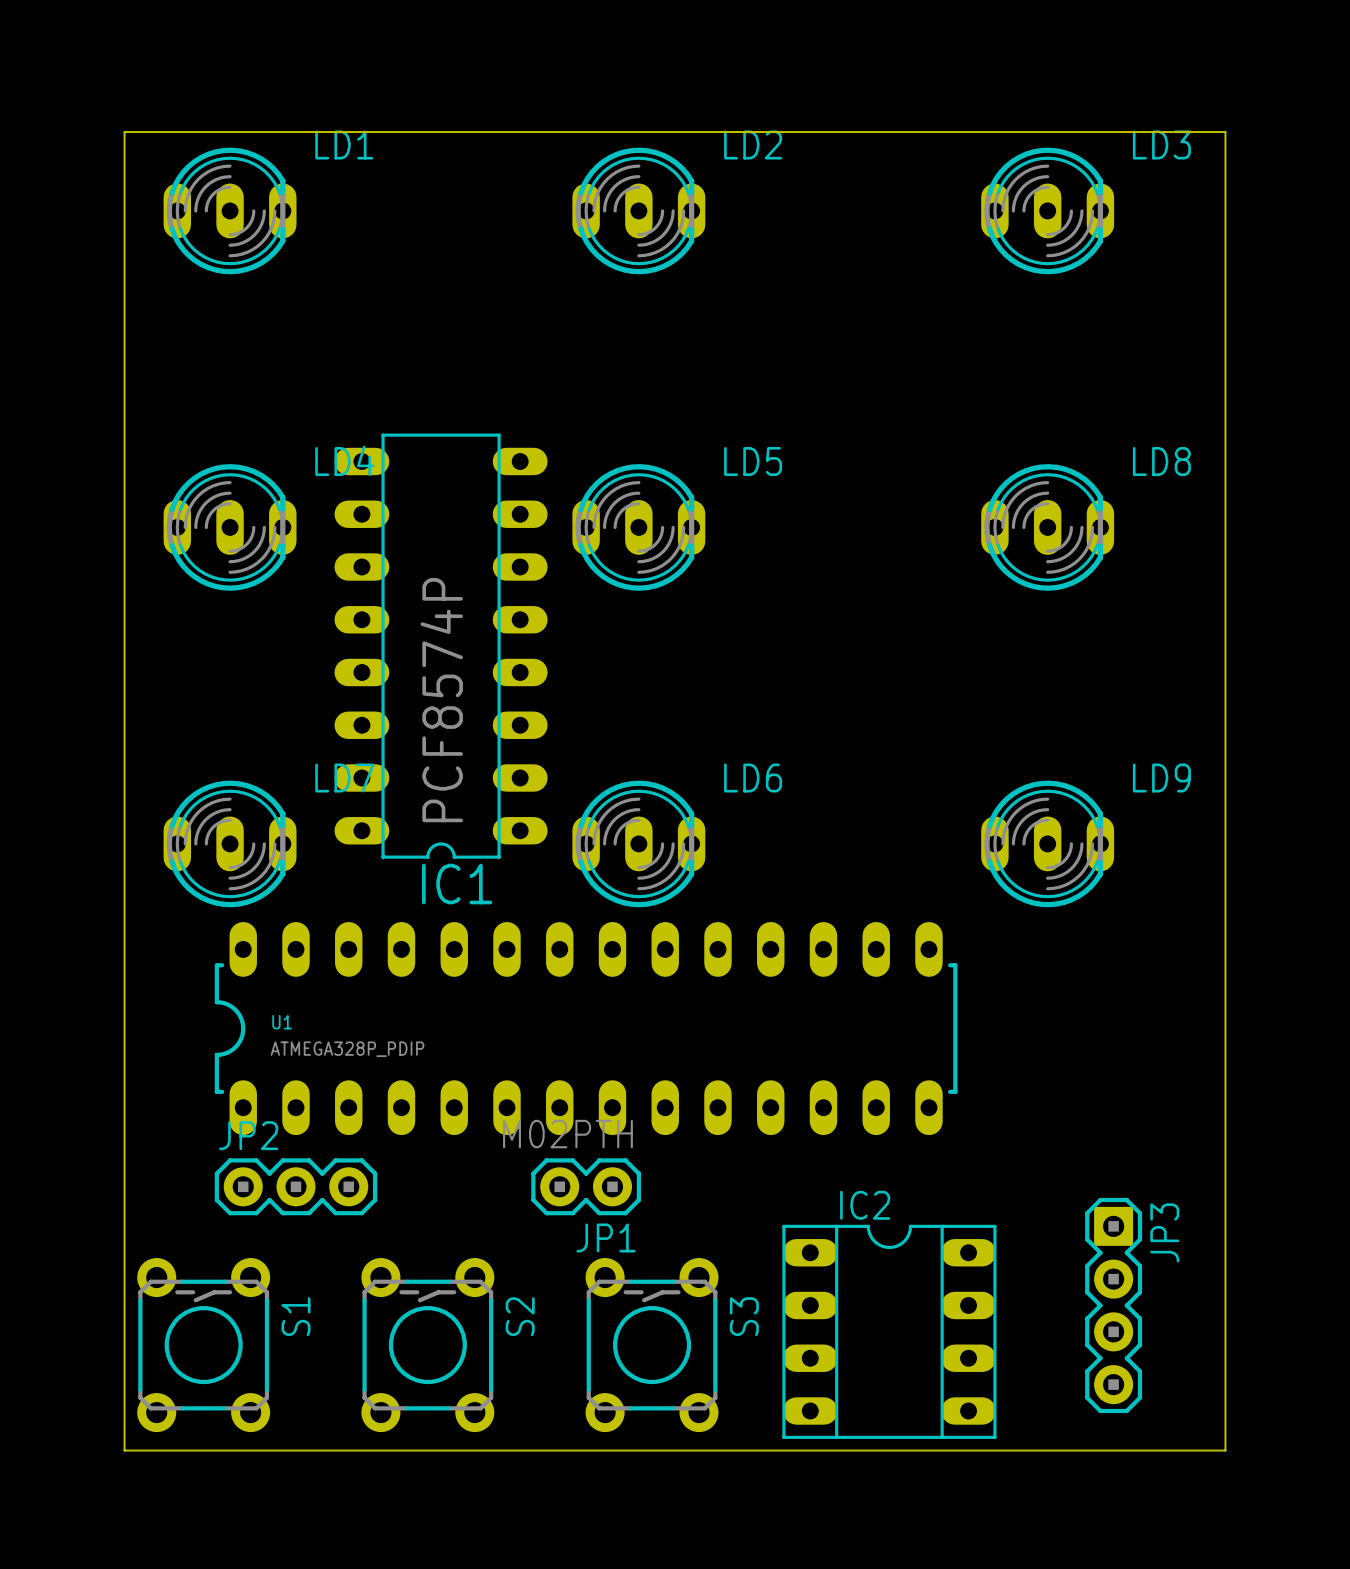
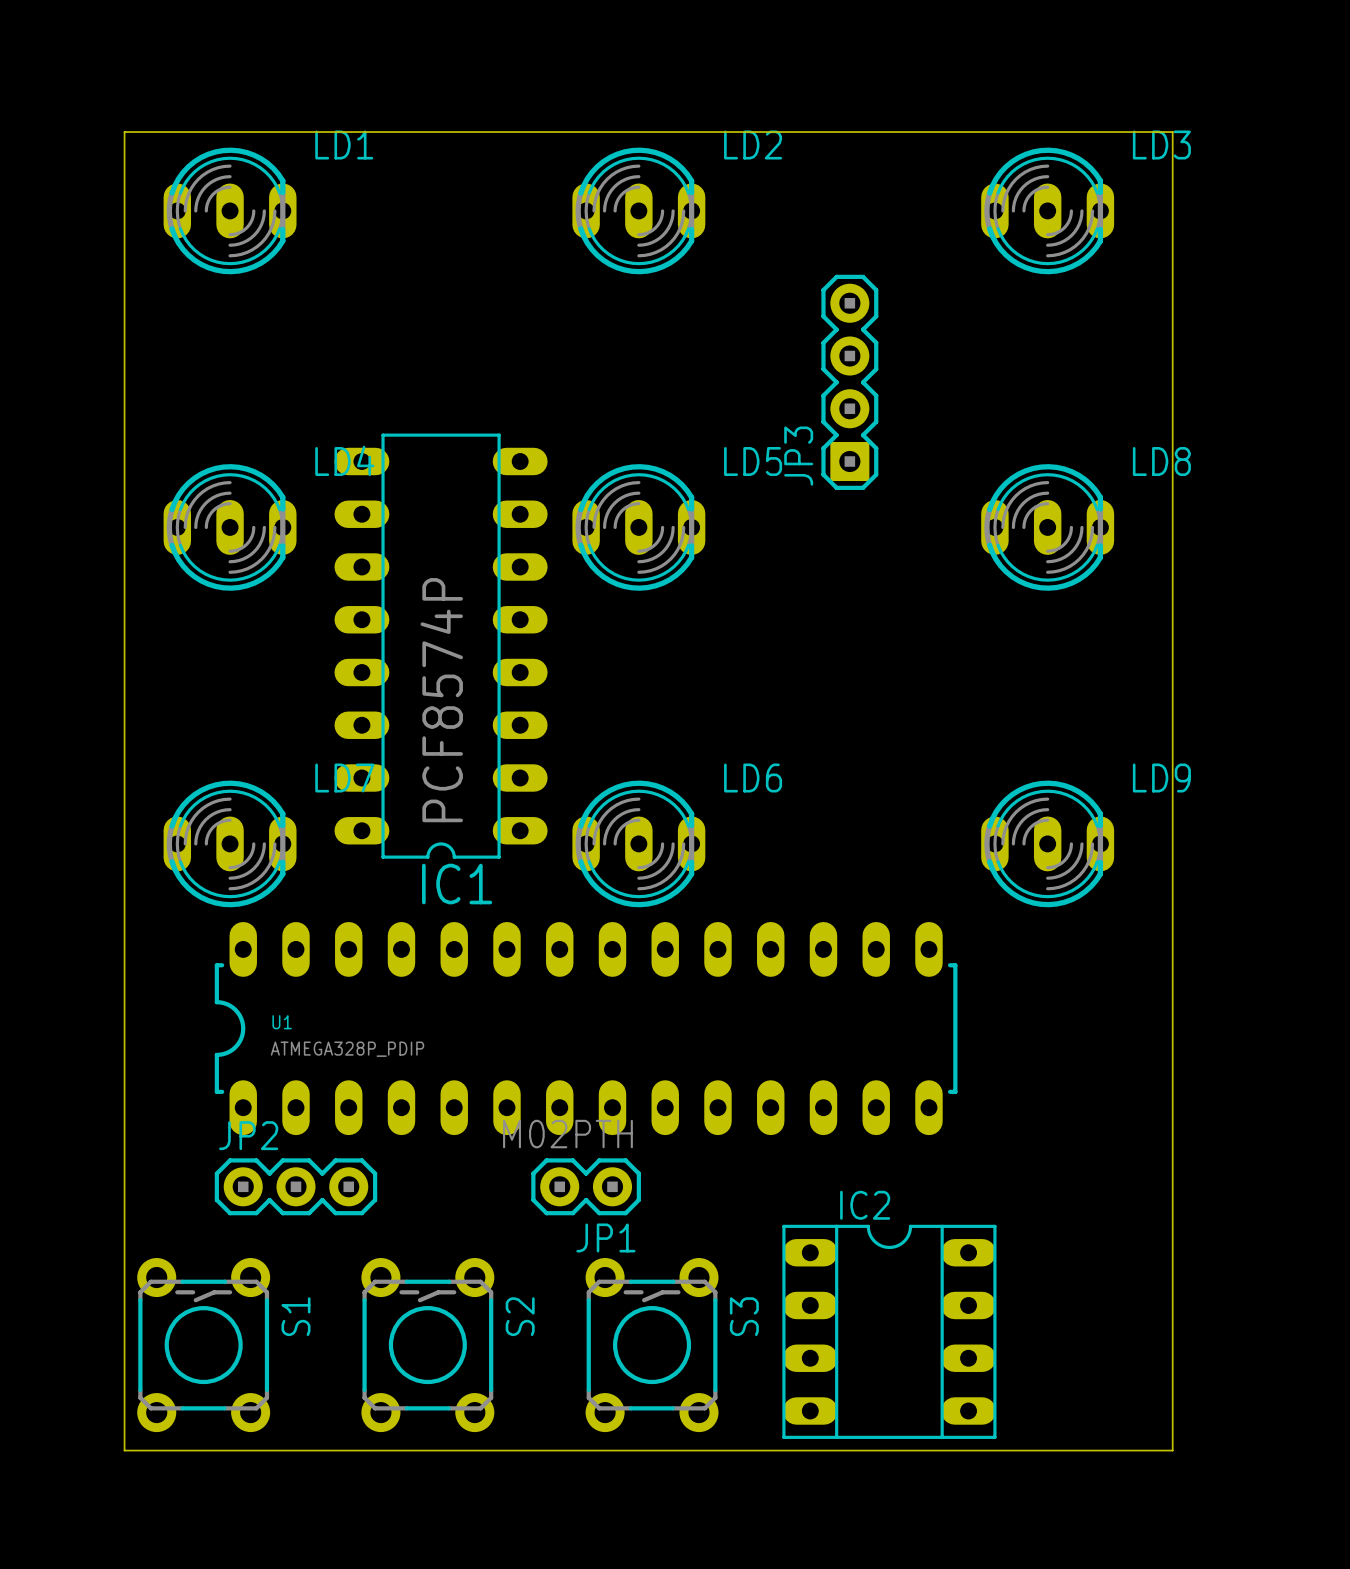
board edge: (1172, 132) (1225, 132) (1225, 1450) (1172, 1450) -> (1172, 132) (1172, 1450)
JP3 rotation: 0° (1113, 1305) -> 180° (849, 382)
JP3 position: (1113, 1305) -> (849, 382)

